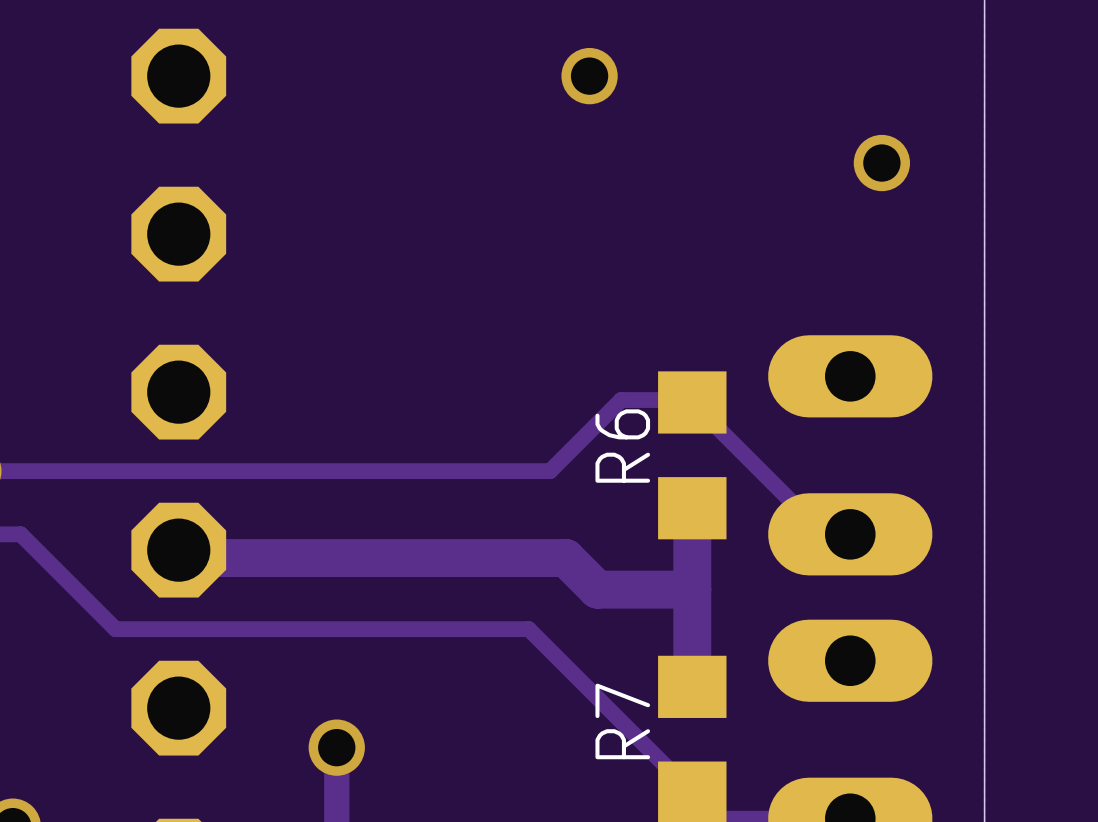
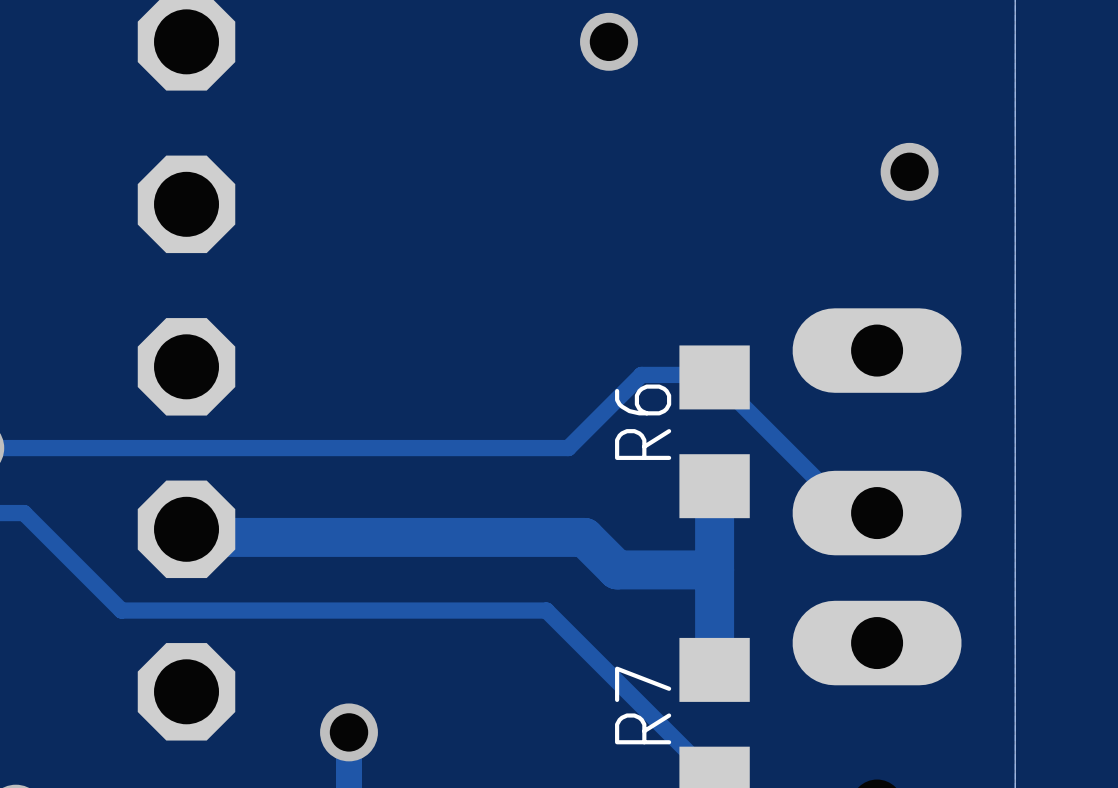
via position: (881, 163) -> (909, 171)

